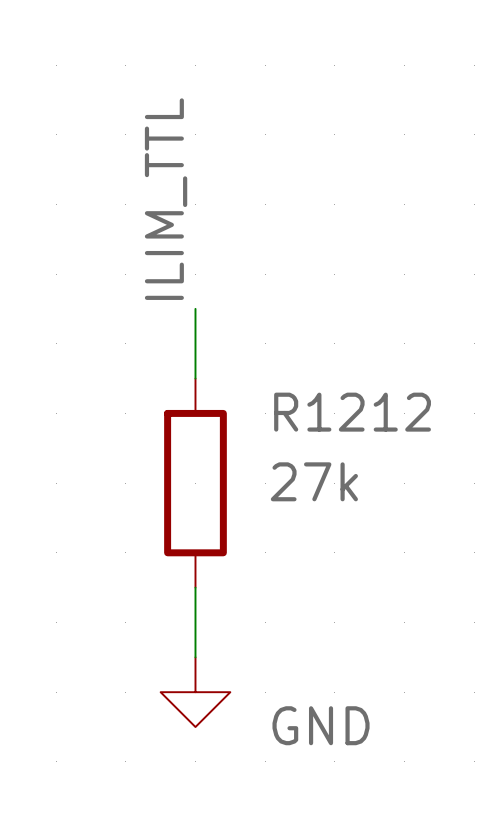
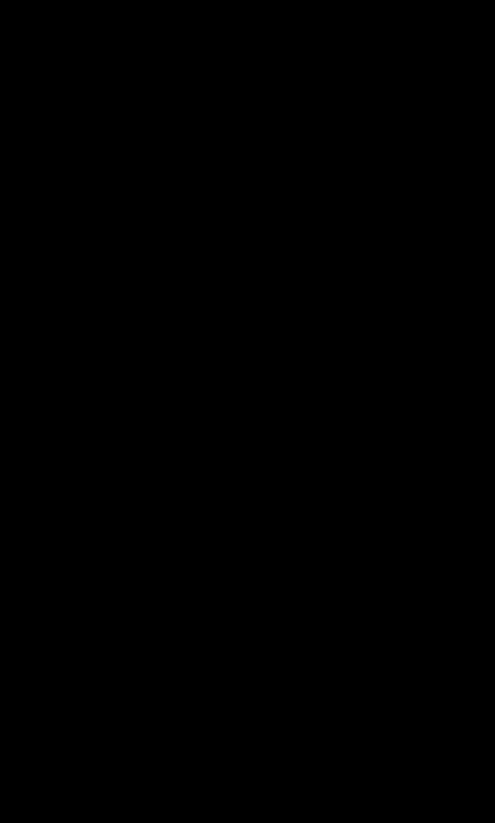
label: ILIM_TTL (166, 199) -> none
wire: (195, 308) (195, 378) -> none
R1212: 27k (195, 483) -> none
wire: (195, 587) (195, 657) -> none
power symbol: GND (195, 692) -> none

